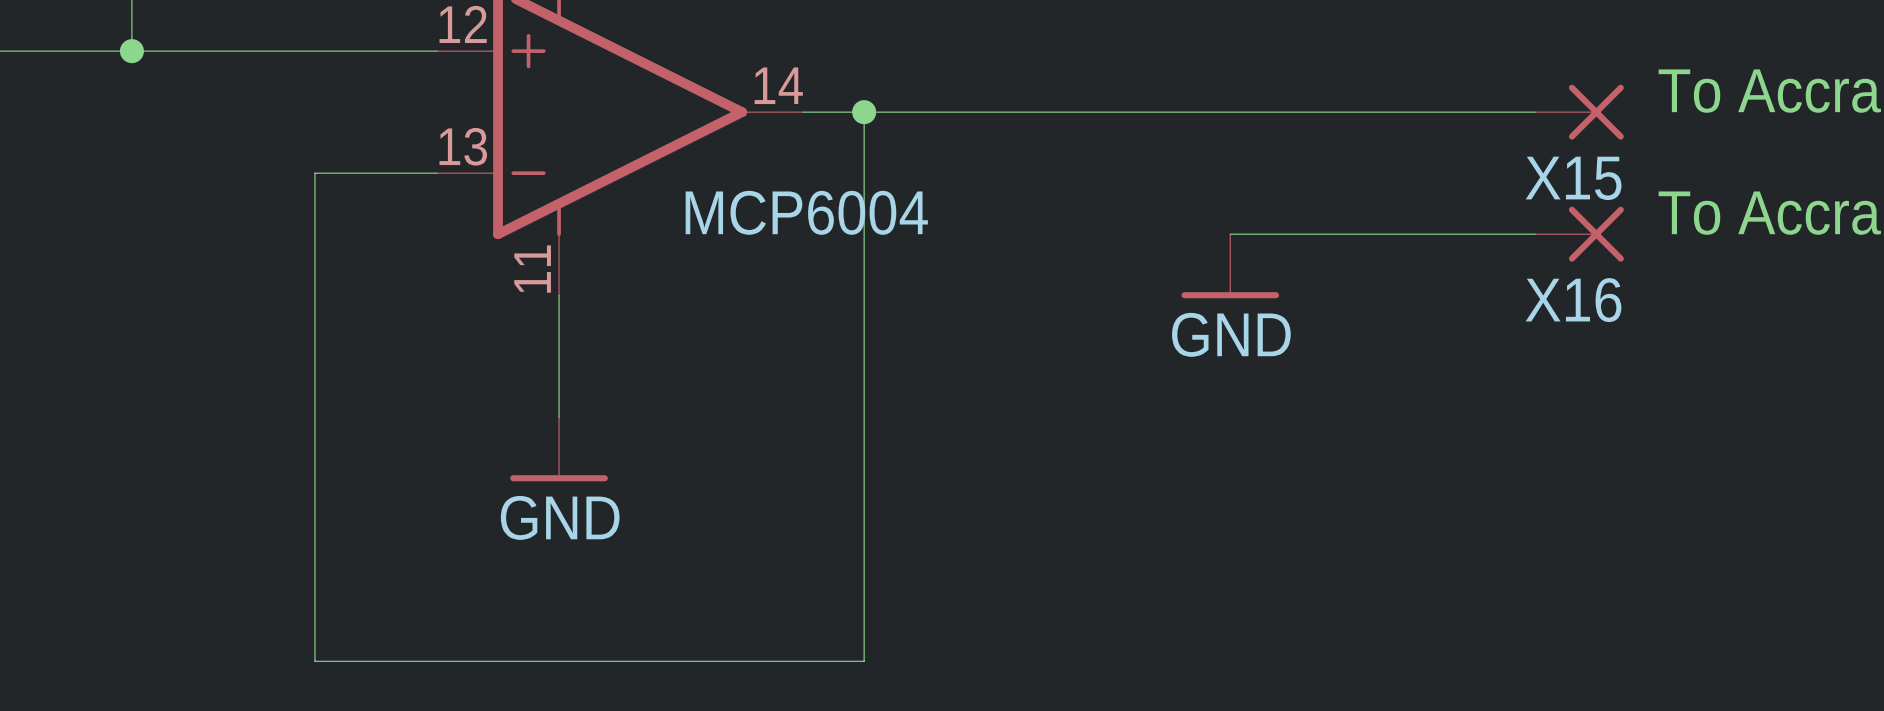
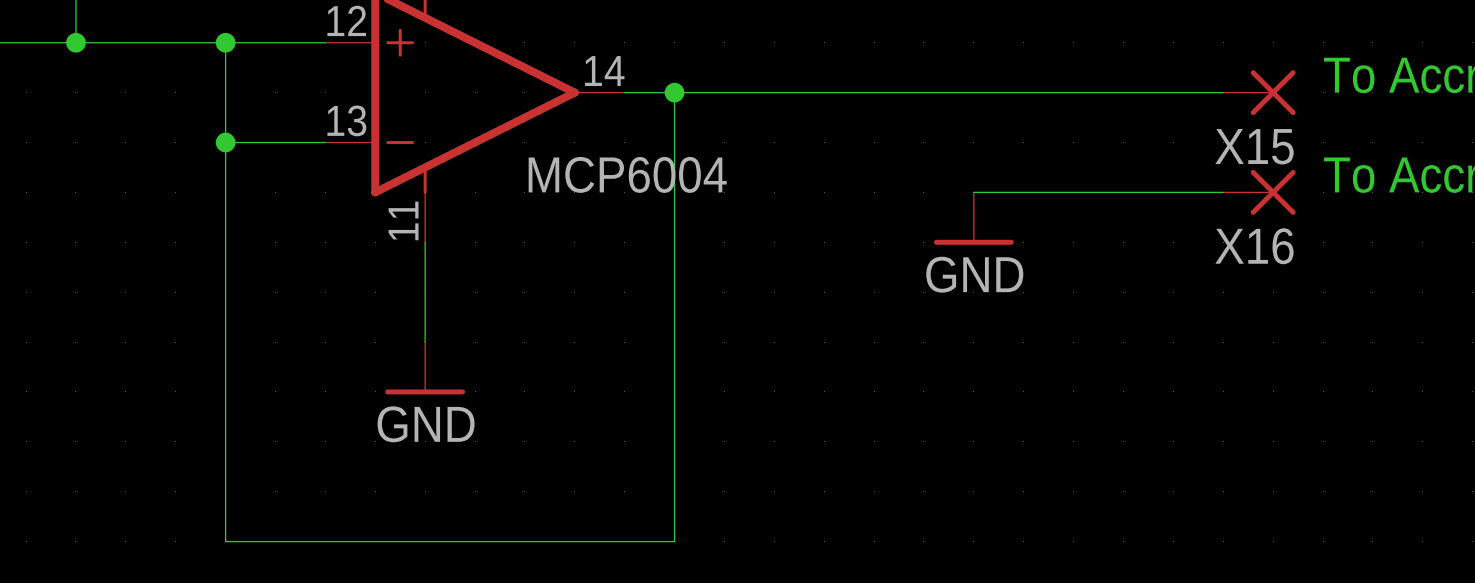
wire: none -> (225, 42) (225, 142)
junction: none -> (225, 42)
junction: none -> (225, 142)

